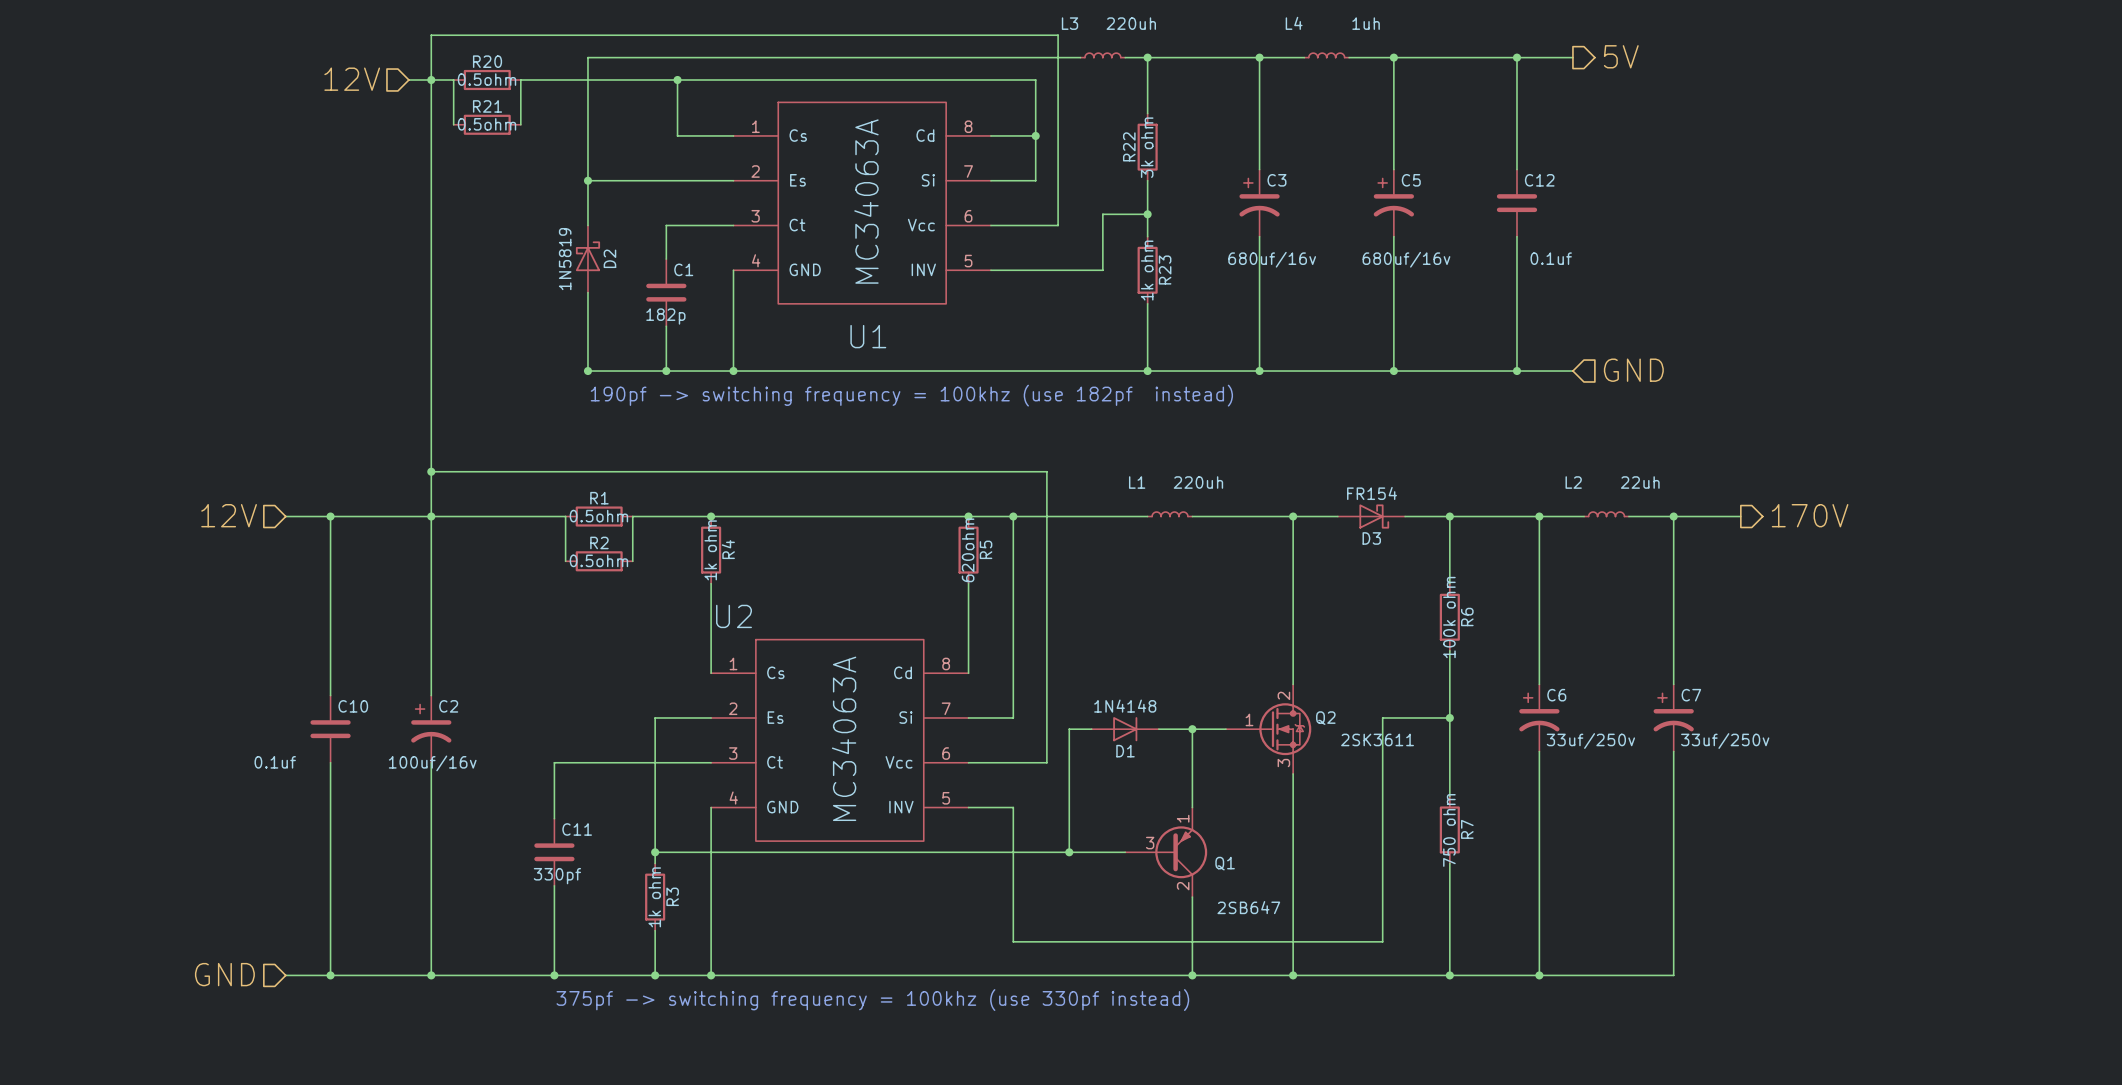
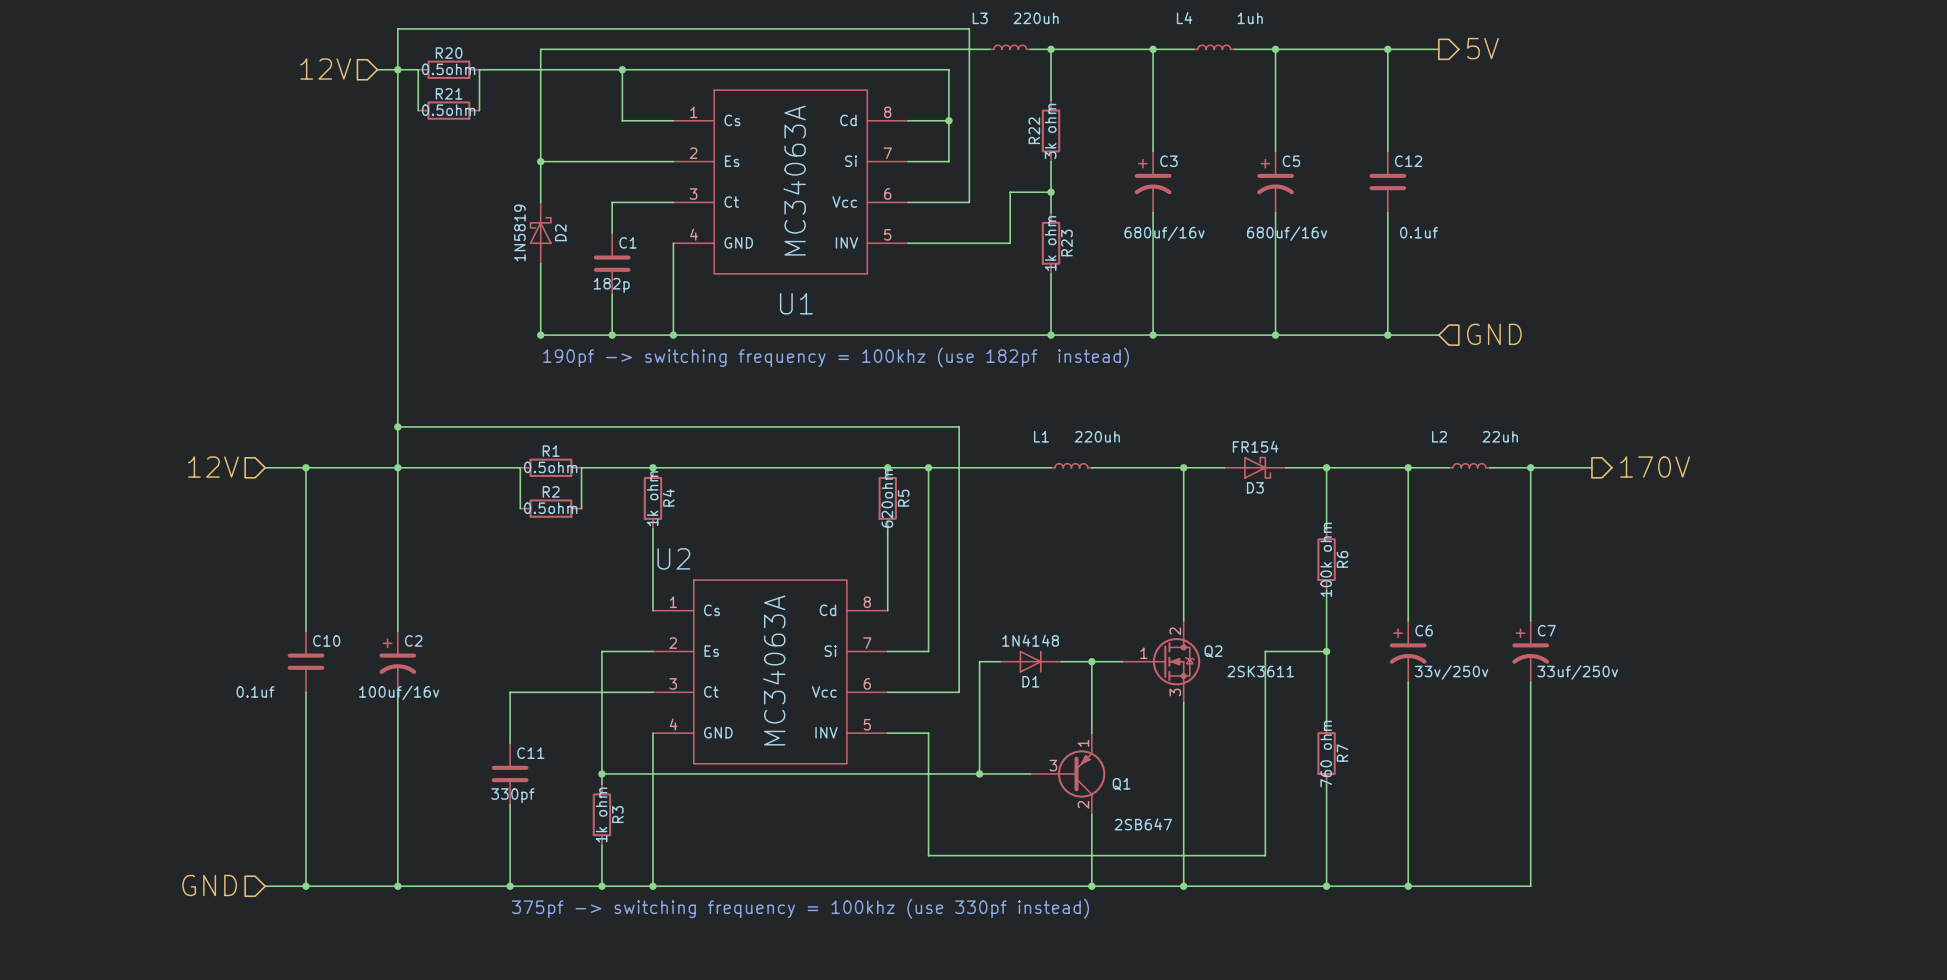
C6 value: 33uf/250v (1590, 741) -> 33v/250v (1451, 672)
R7 value: 750 ohm (1449, 830) -> 760 ohm (1326, 754)

